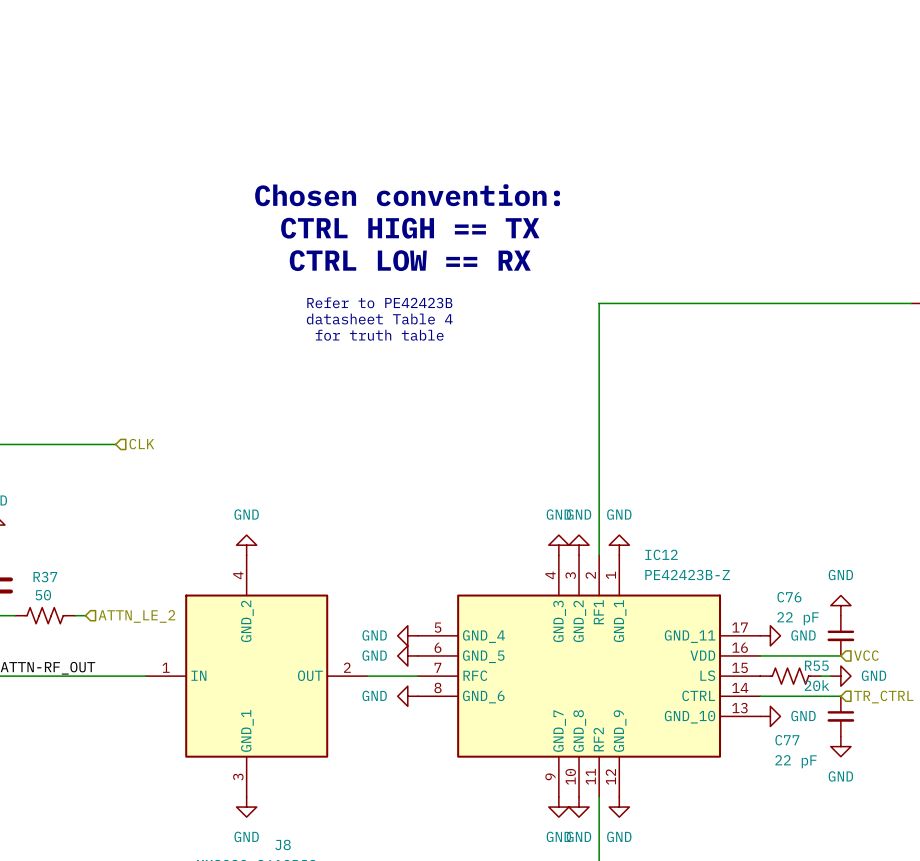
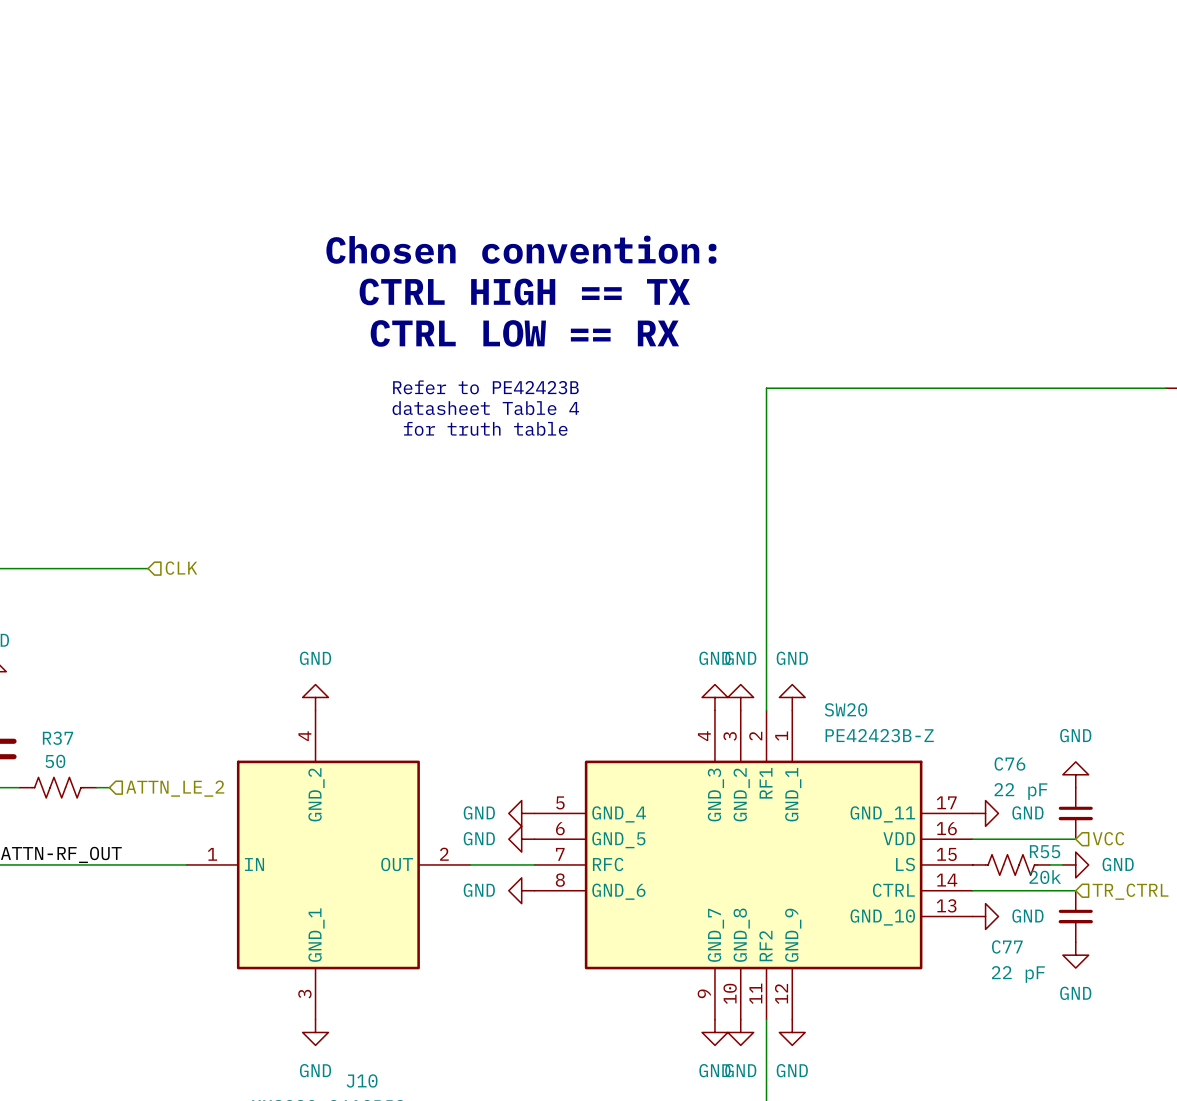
IC12 name: IC12 (661, 554) -> SW20 (845, 709)
J8 name: J8 (283, 844) -> J10 (362, 1080)

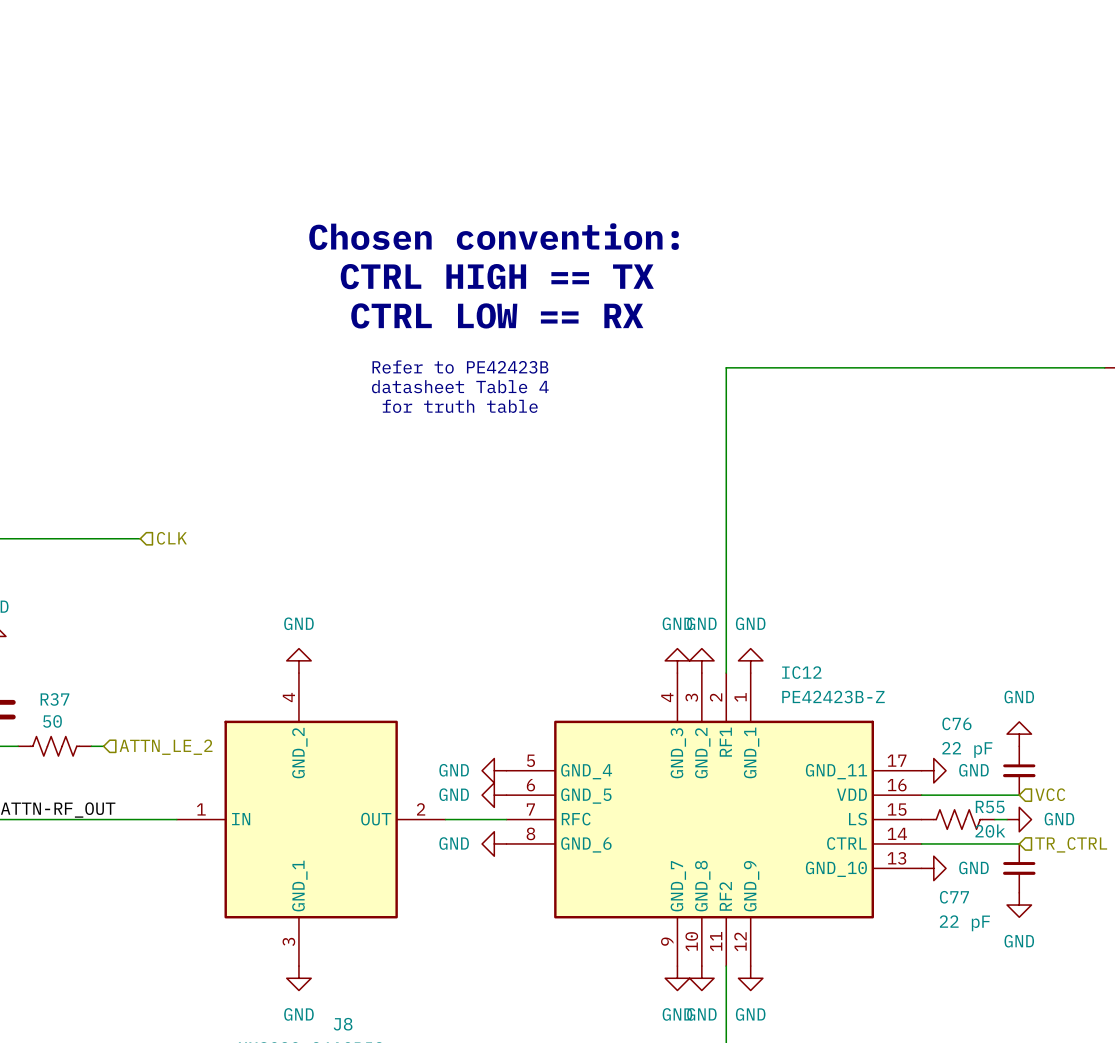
SW20 name: SW20 (845, 709) -> IC12 (801, 672)
J10 name: J10 (362, 1080) -> J8 (343, 1024)

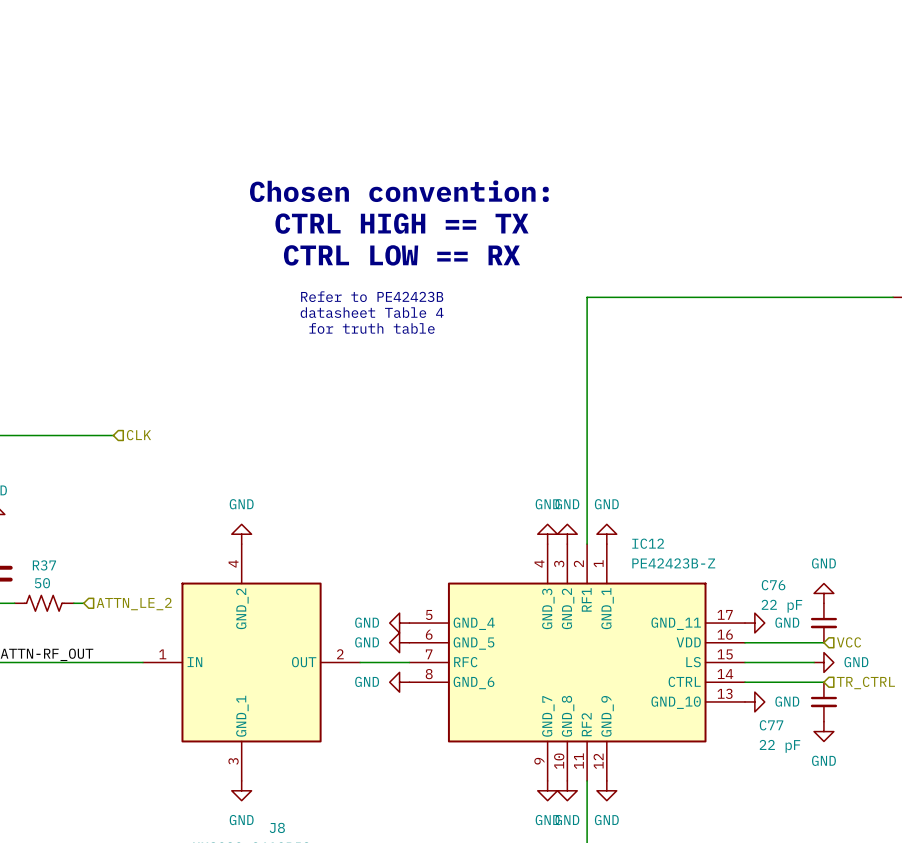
R55: 20k (958, 819) -> none

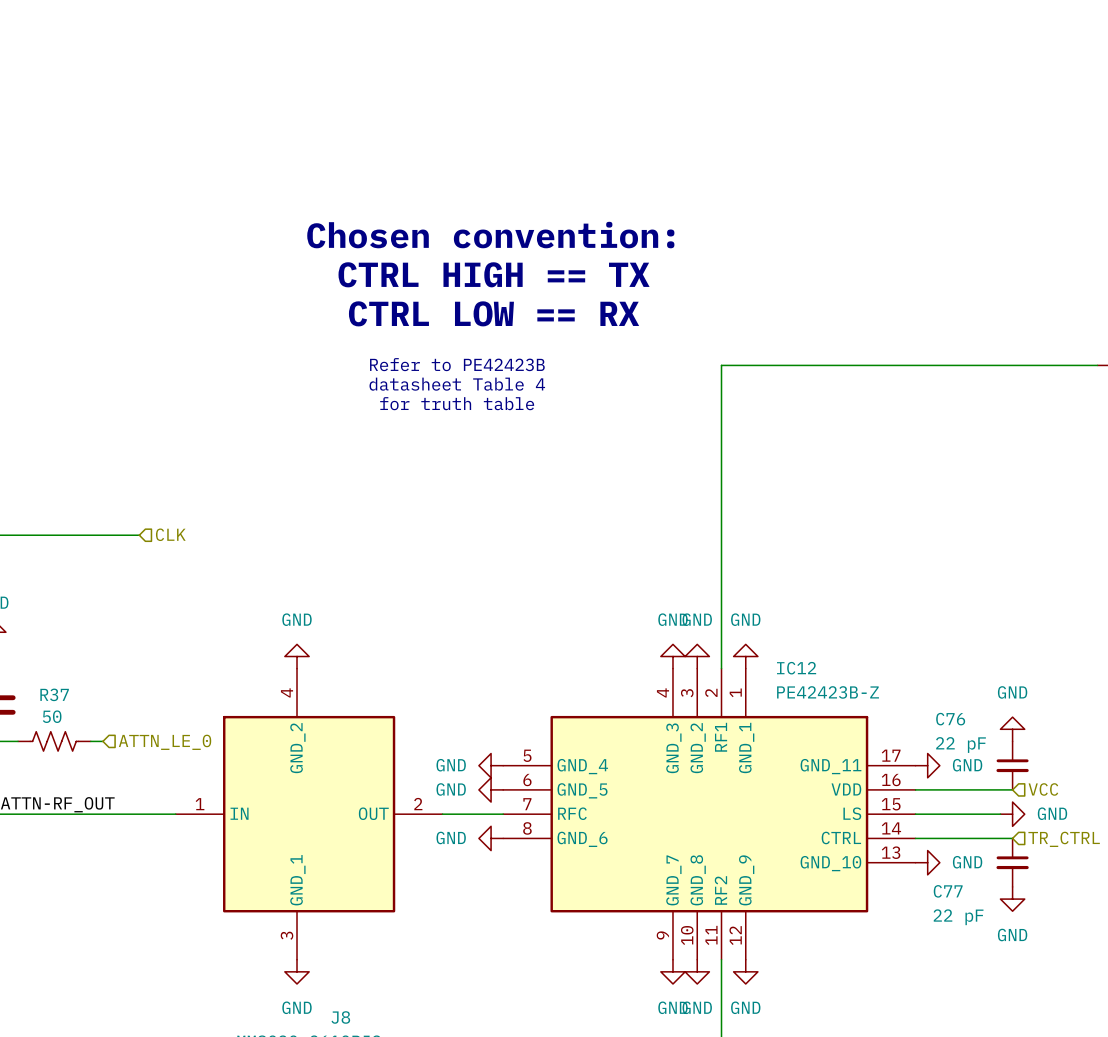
hierarchical label: ATTN_LE_2 (134, 604) -> ATTN_LE_0 (165, 742)

